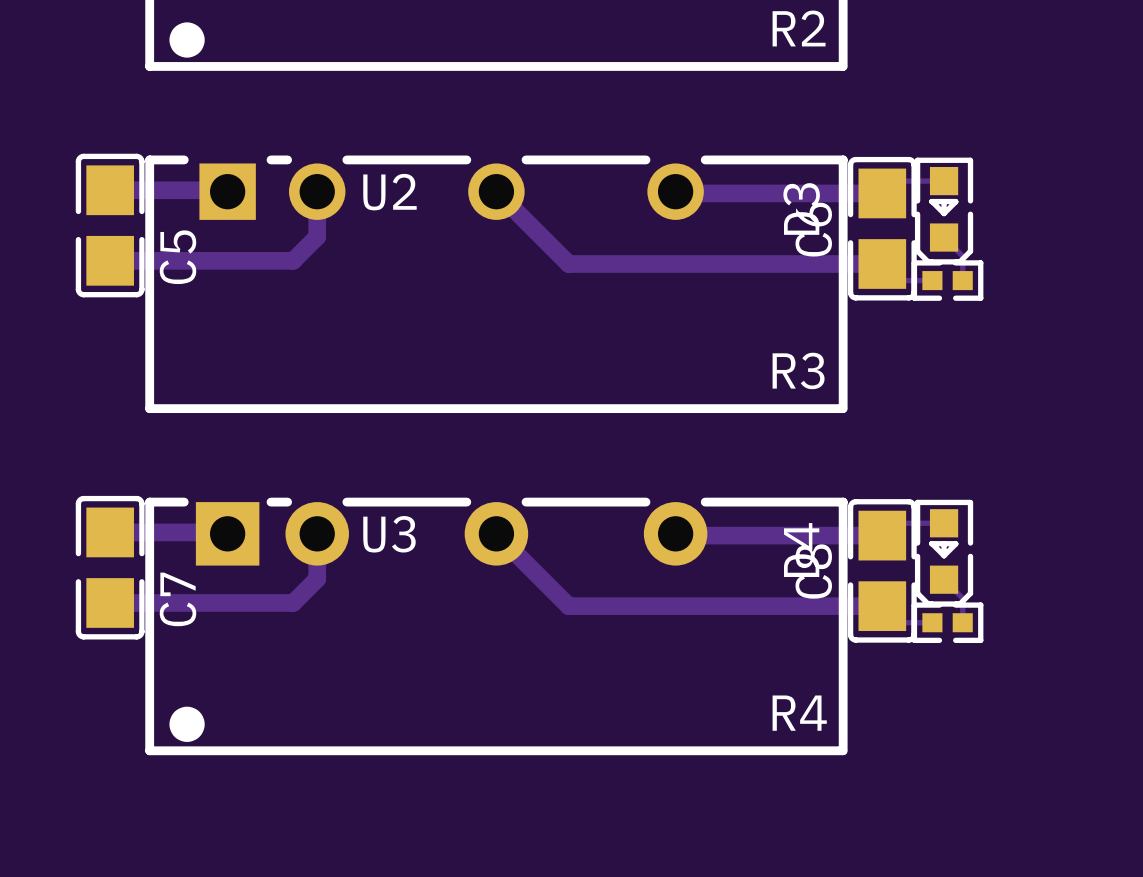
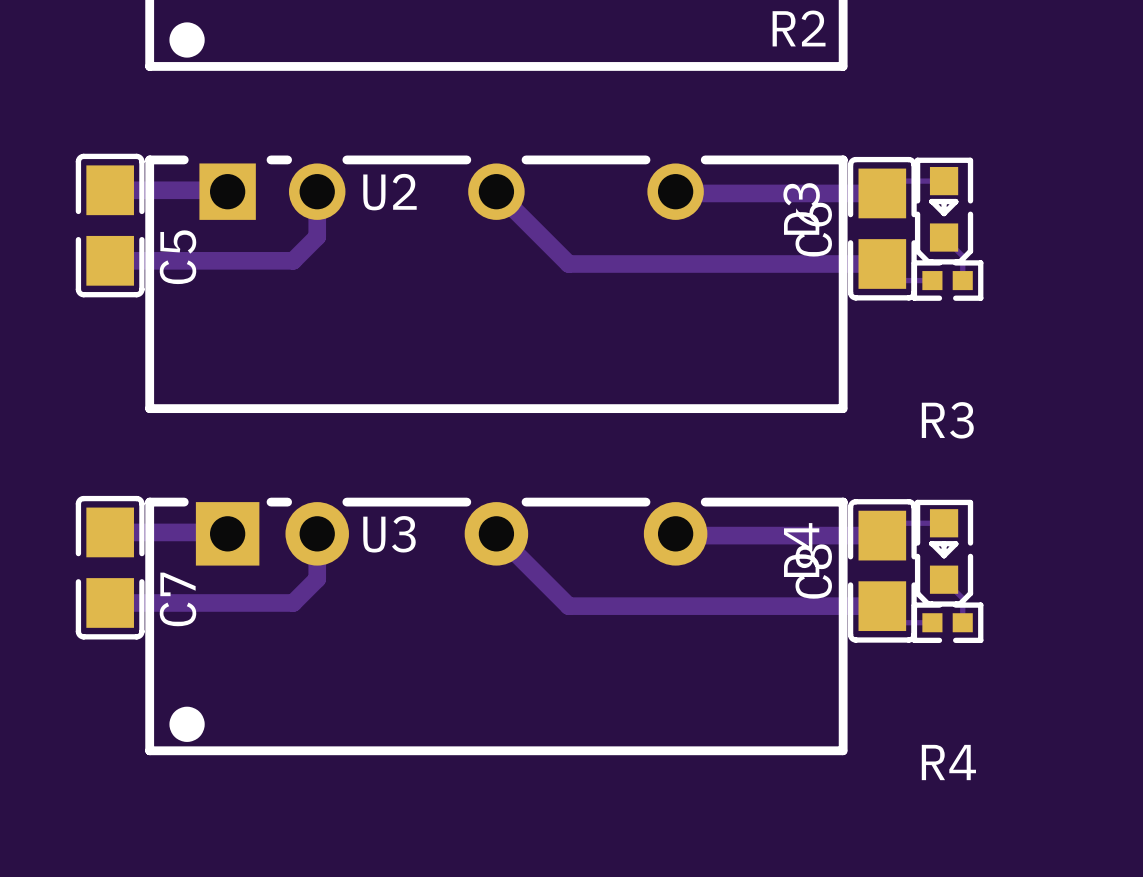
R3 name position: R3 (798, 370) -> R3 (947, 420)
R4 name position: R4 (799, 713) -> R4 (948, 762)

